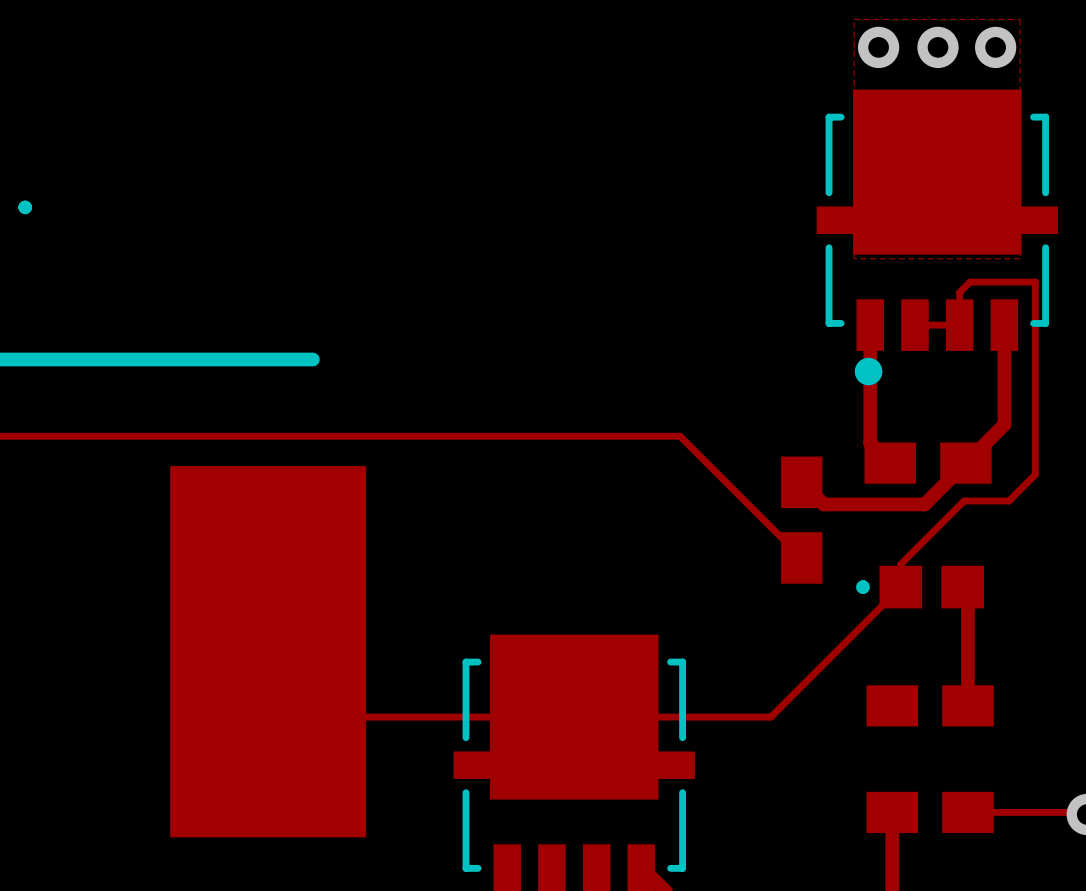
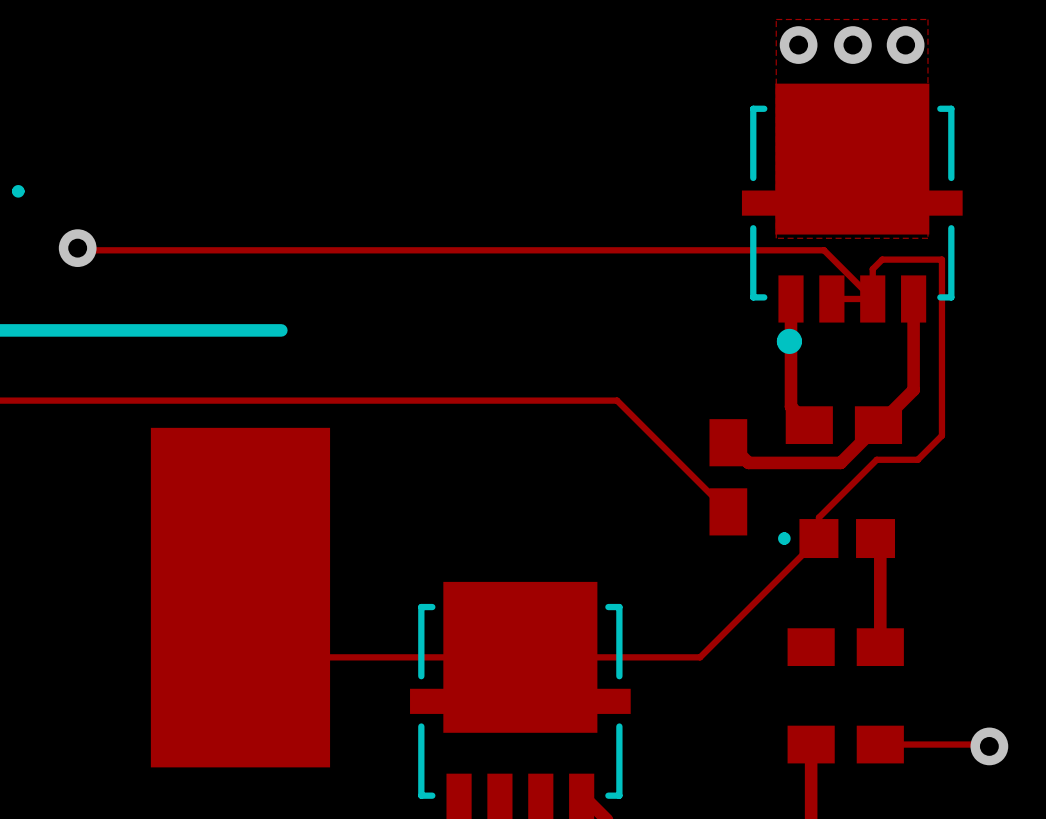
track: none -> (77, 248) (79, 250) (824, 250) (872, 298)
via: none -> (77, 248)

